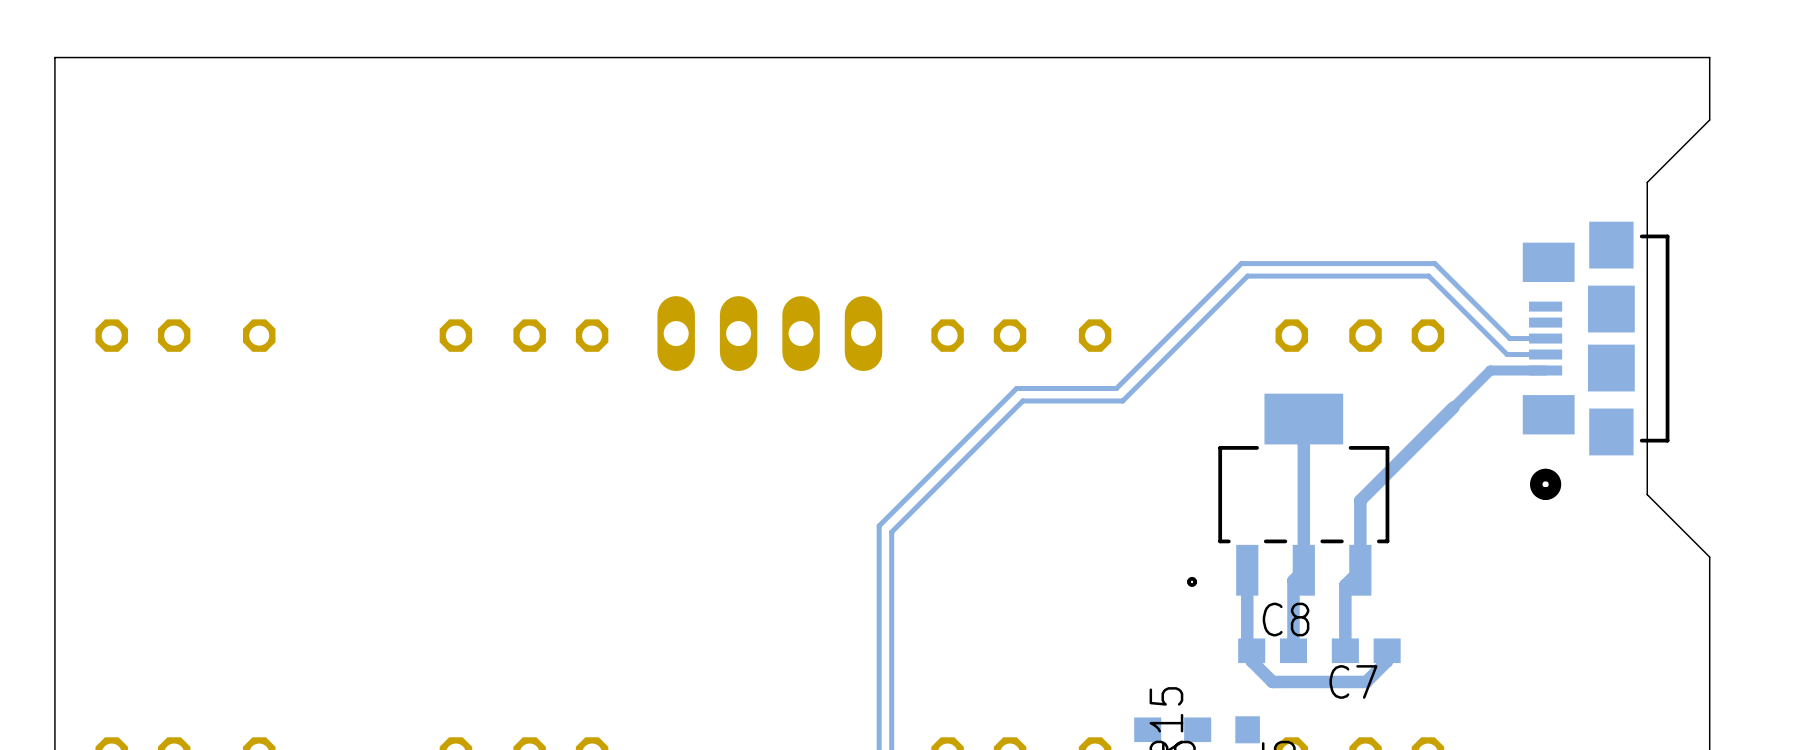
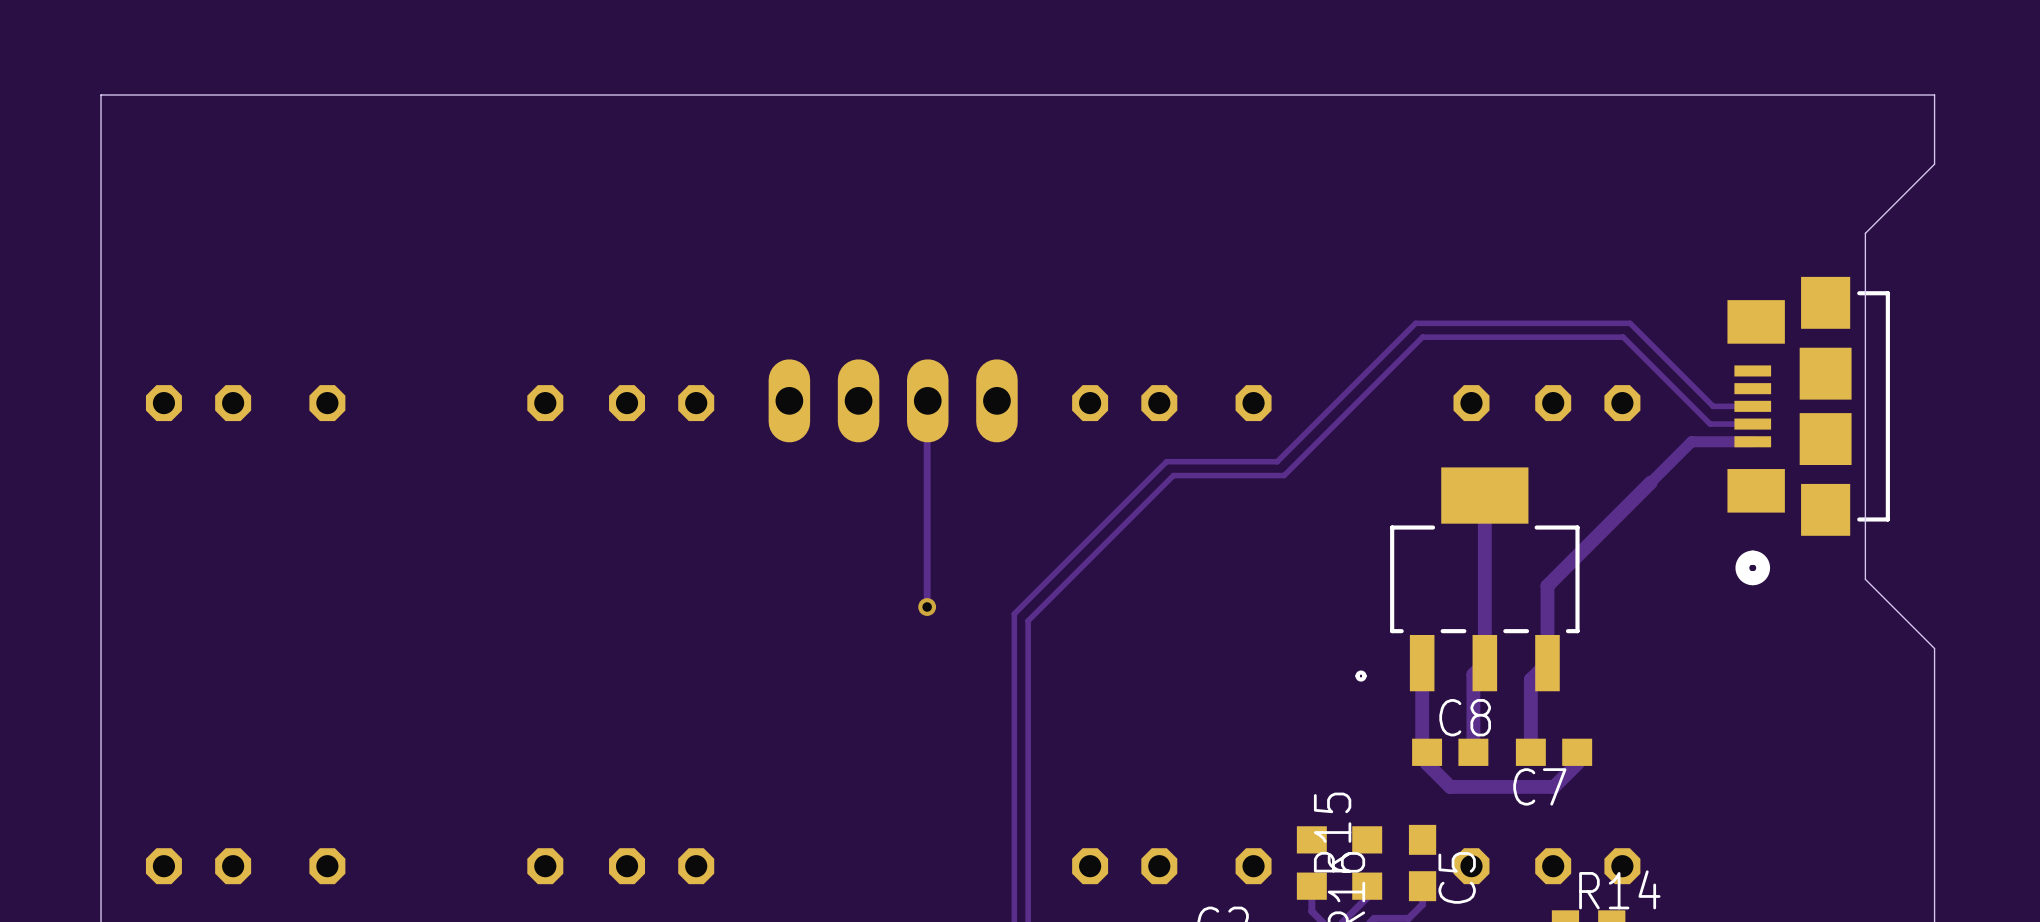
track: none -> (927, 400) (927, 607)
via: none -> (927, 607)

